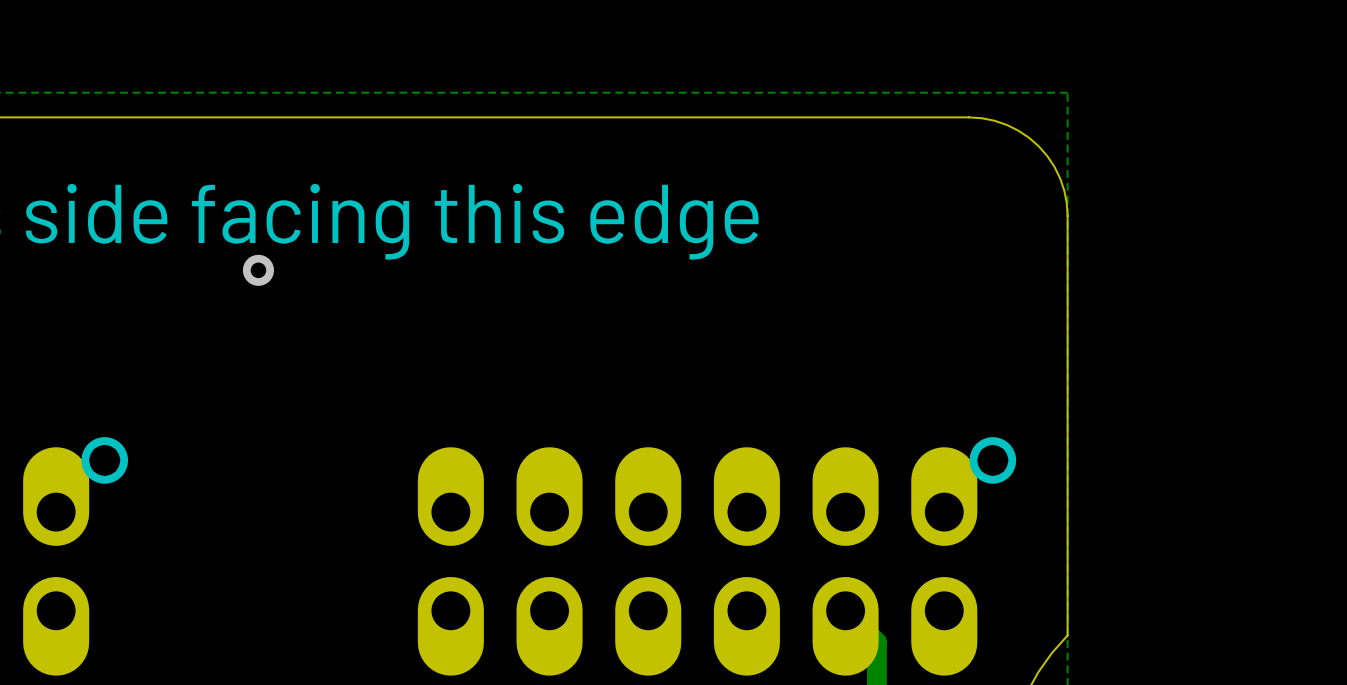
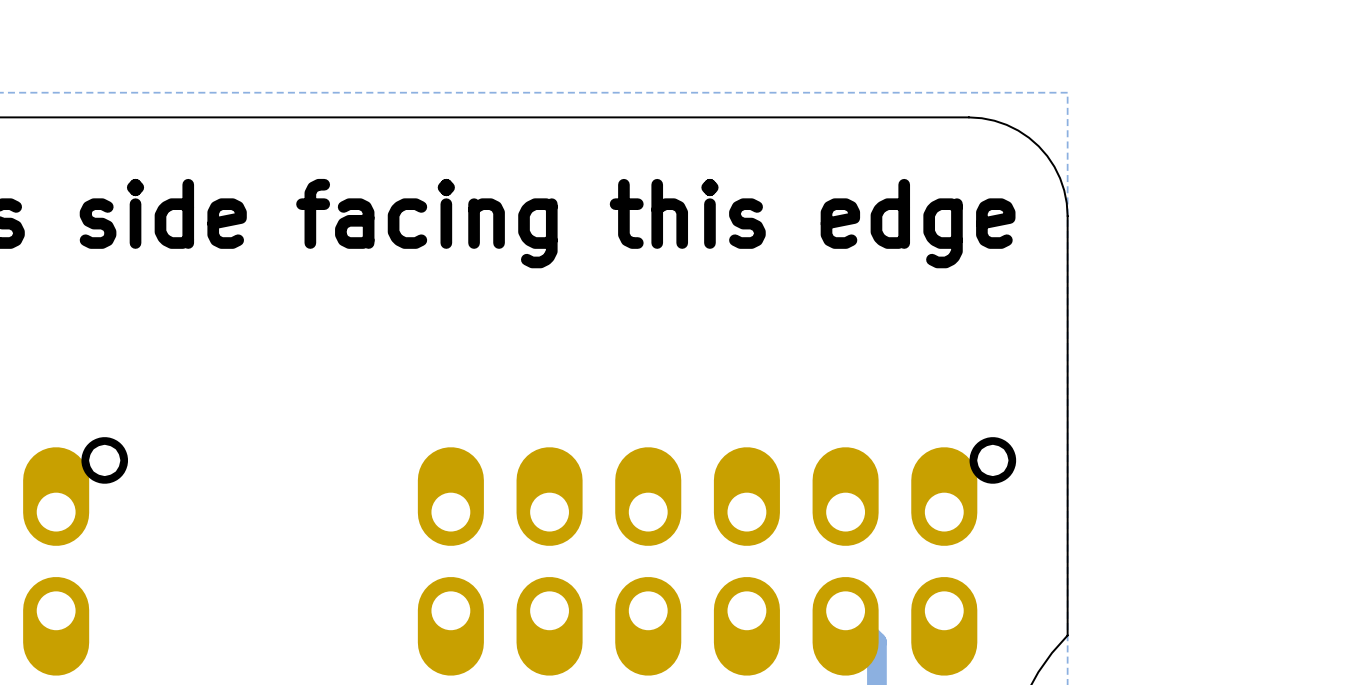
via: (258, 270) -> none

